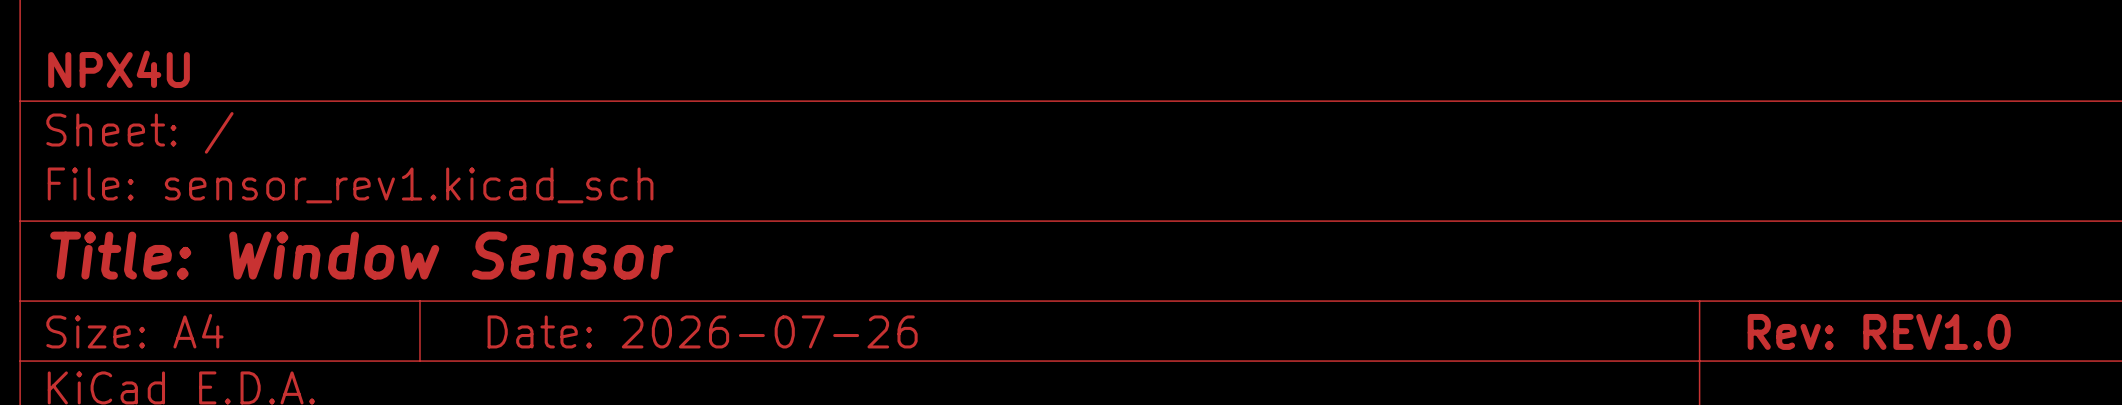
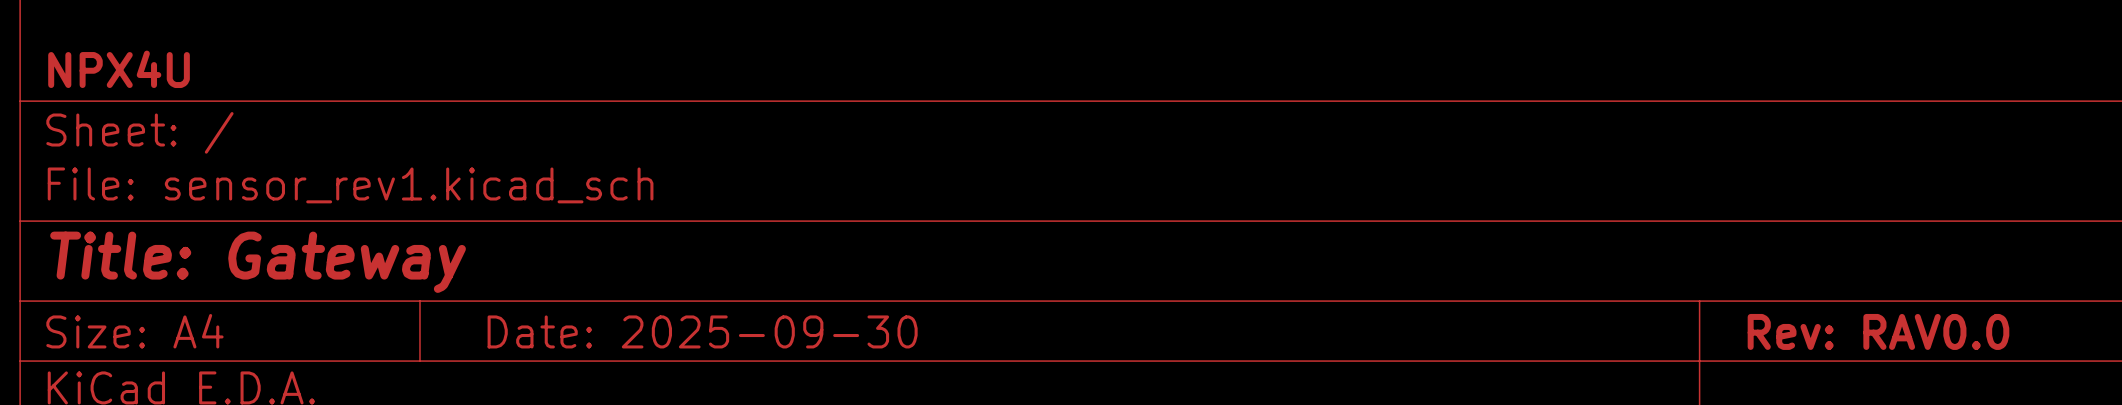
title block: Title: Window Sensor (361, 255) -> Title: Gateway (258, 262)
title block: Date: 2026-07-26 (702, 331) -> Date: 2025-09-30 (702, 331)
title block: Rev: REV1.0 (1879, 331) -> Rev: RAV0.0 (1878, 331)

